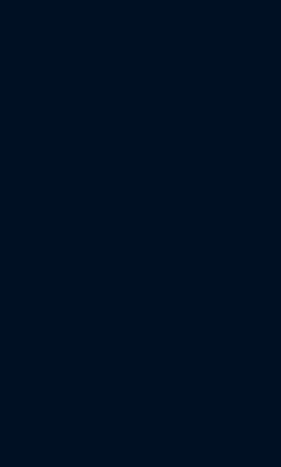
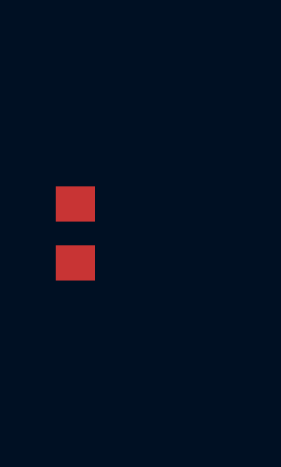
part: none -> (75, 233)

